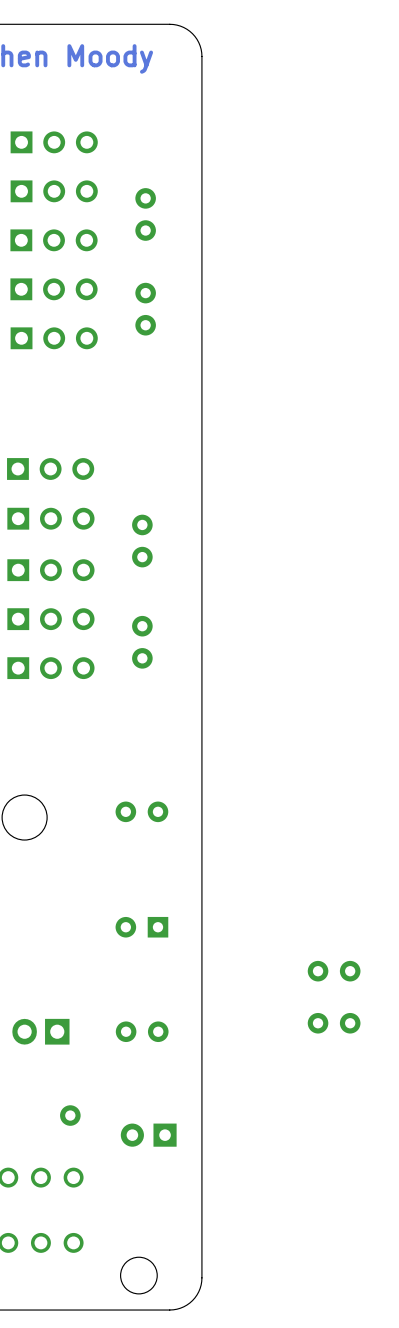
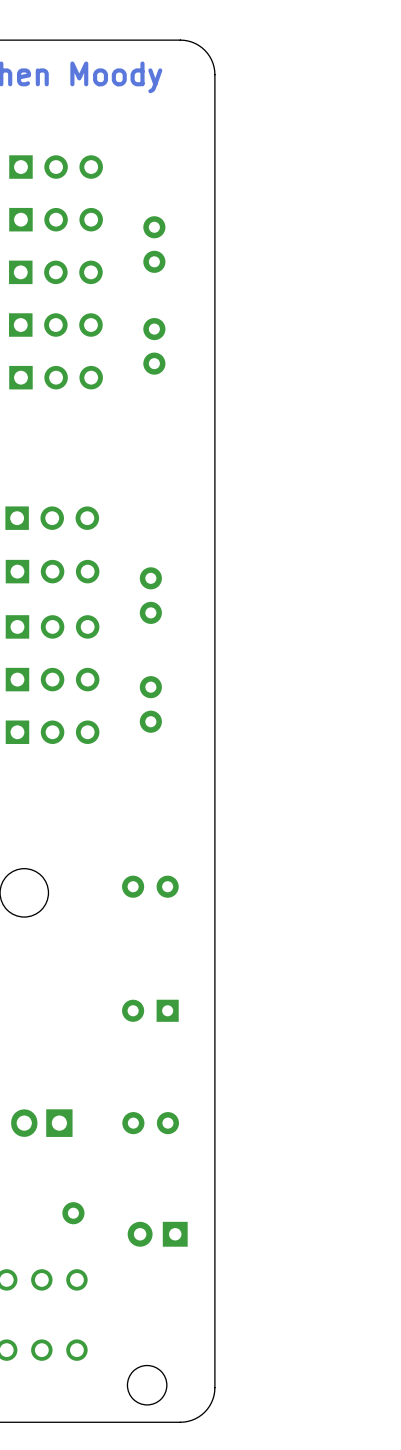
part: (334, 971) -> none
part: (334, 1023) -> none

